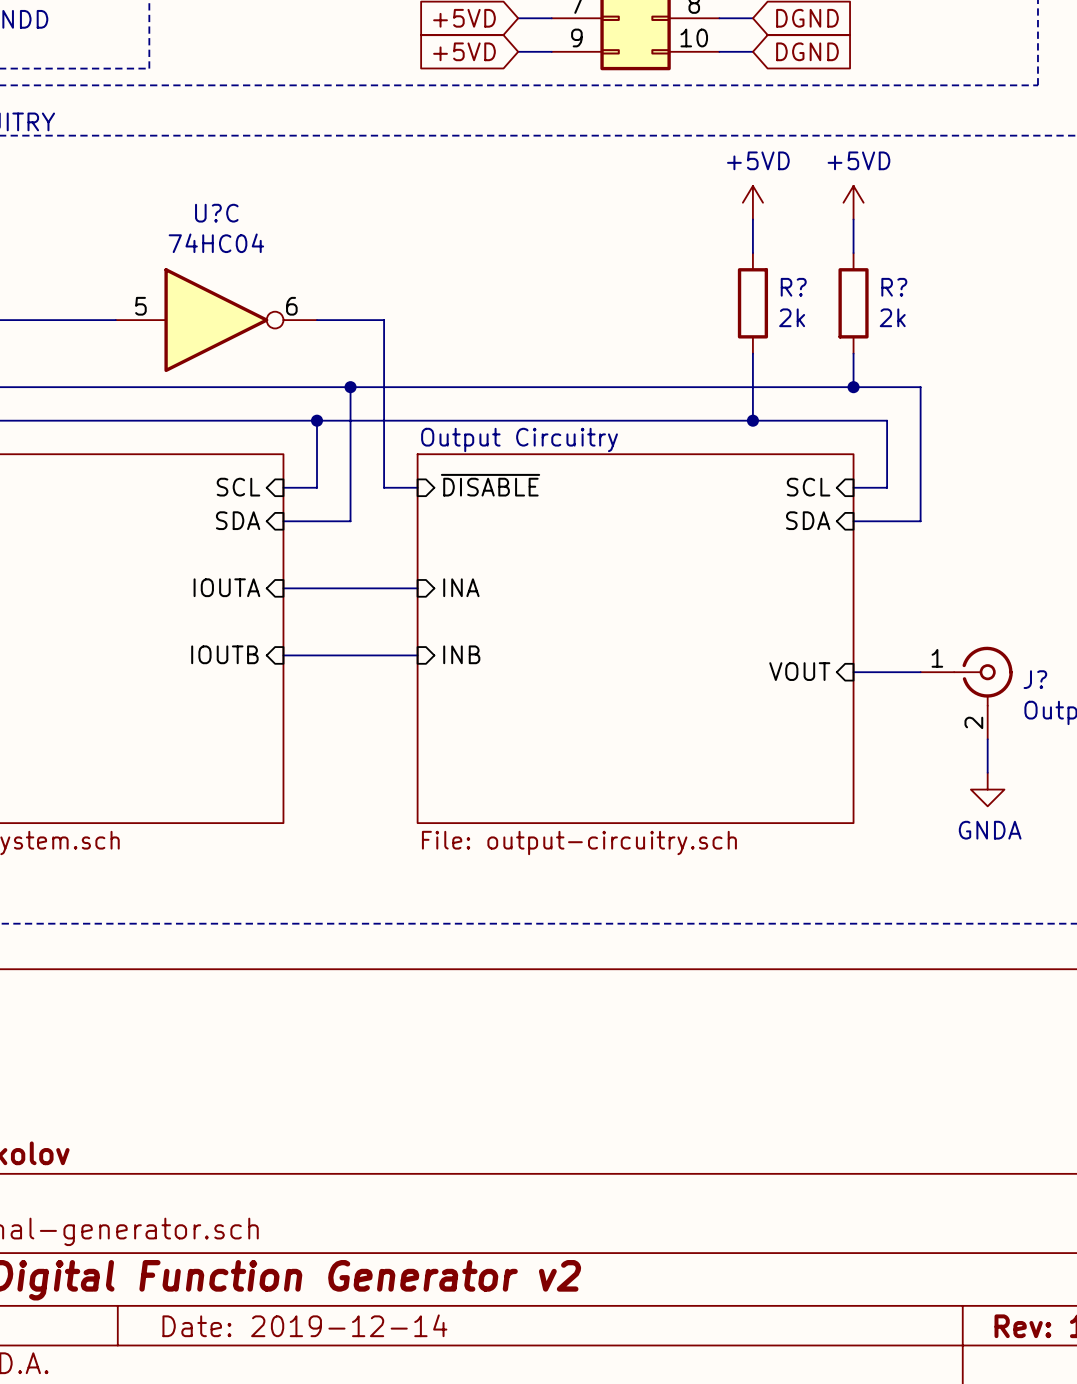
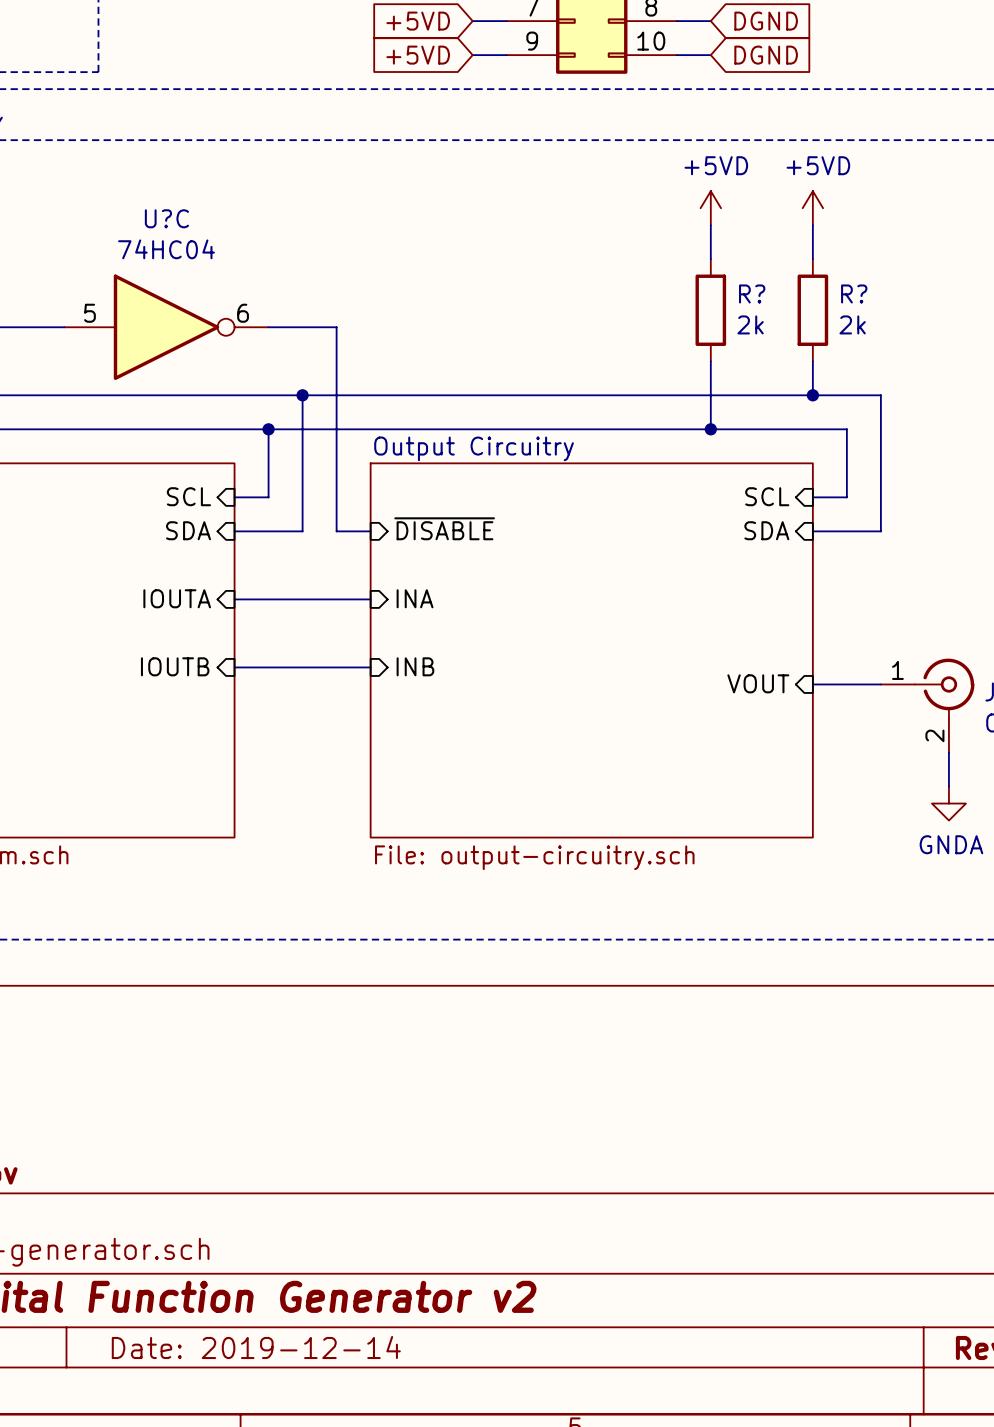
sheet pin position: ~{DISABLE} (490, 485) -> ~{DISABLE} (444, 528)
wire: (384, 487) (417, 487) -> (336, 497) (336, 531) (370, 531)

